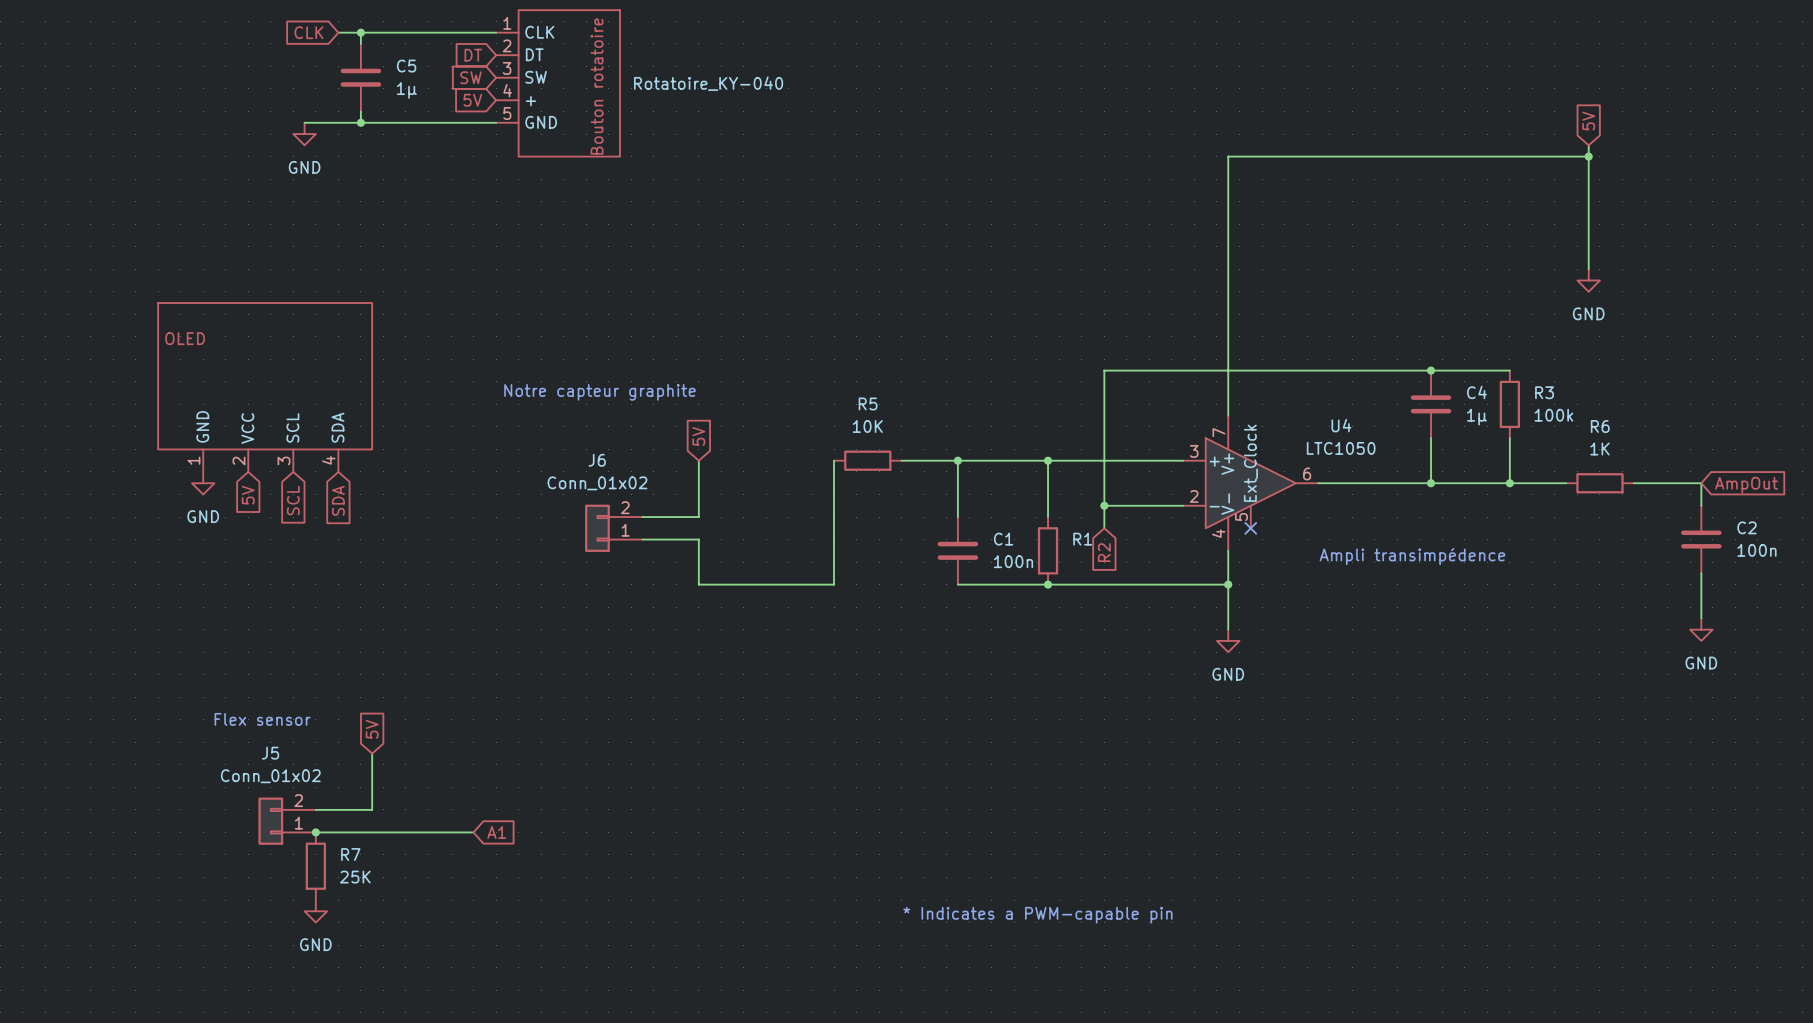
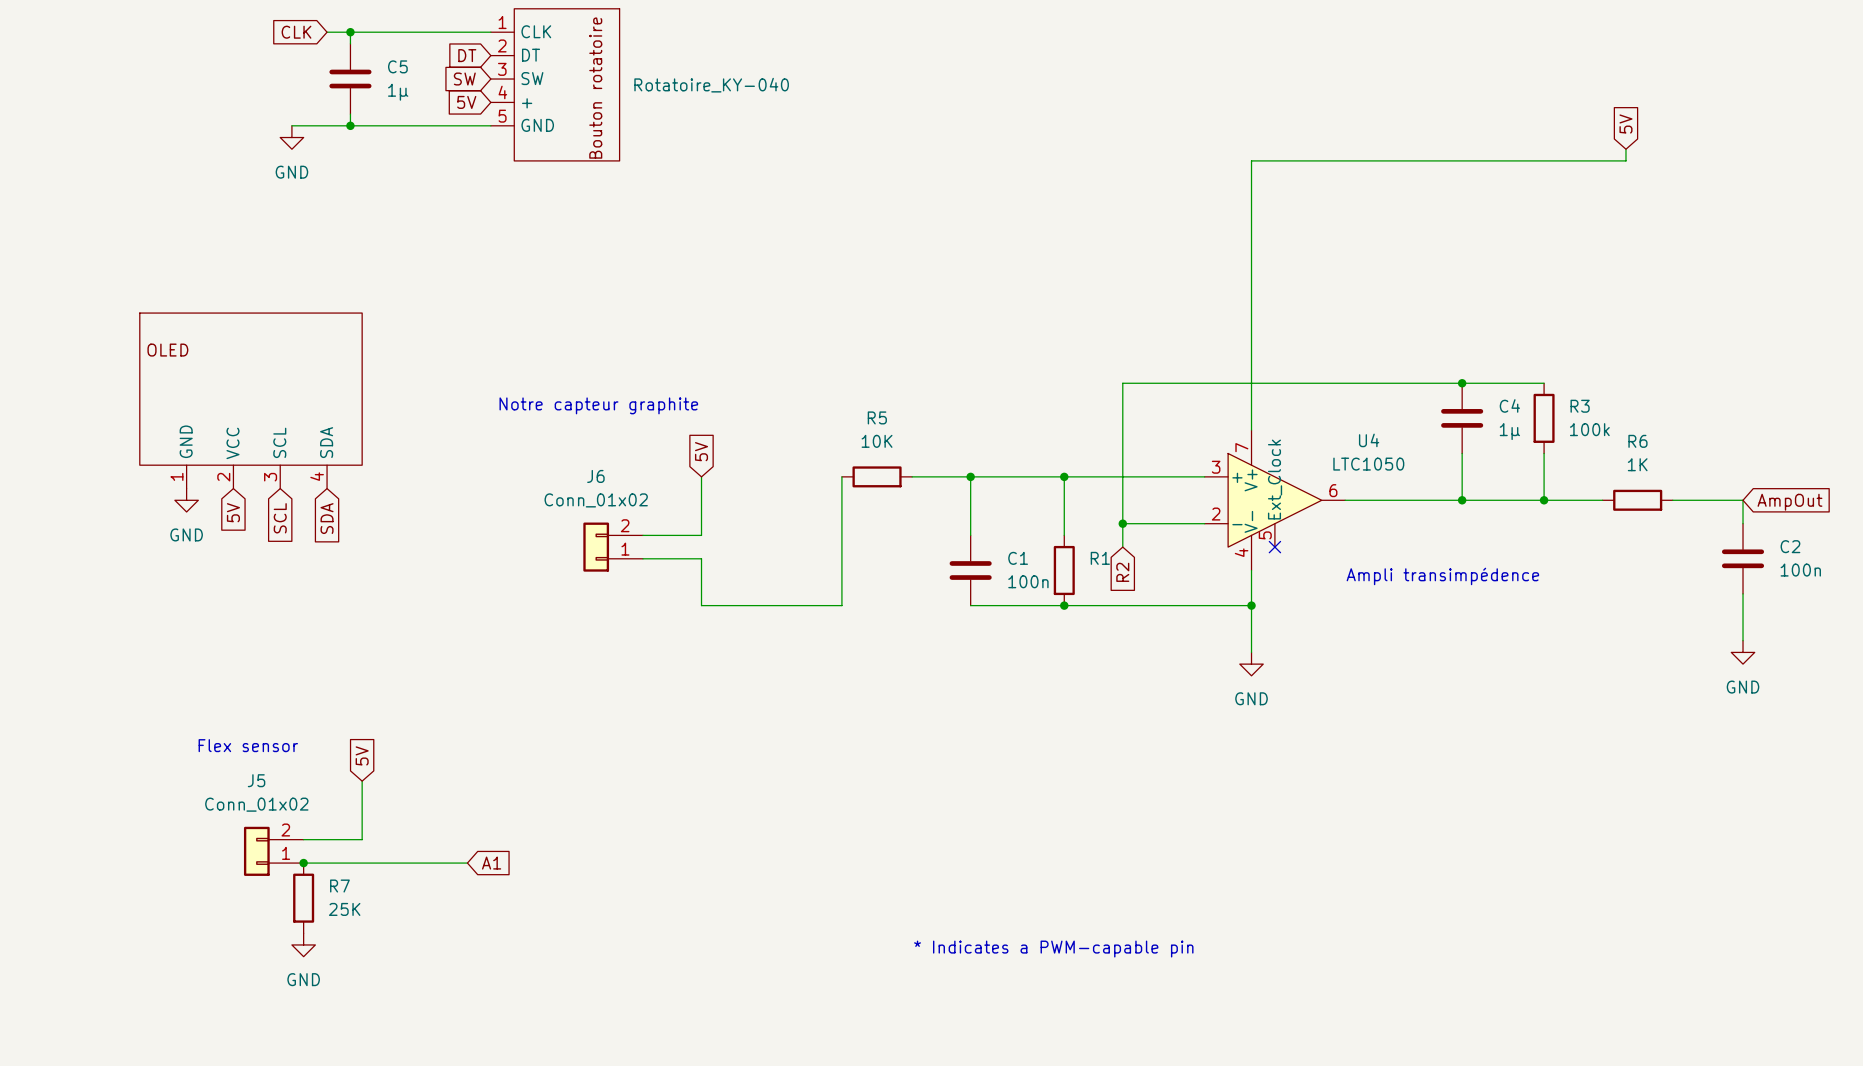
wire: (1588, 156) (1588, 269) -> none
junction: (1588, 156) -> none
power symbol: GND (1588, 280) -> none

